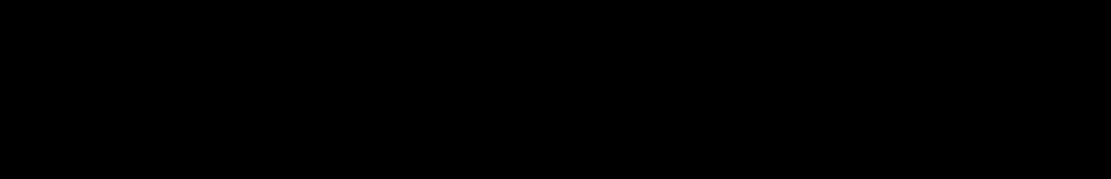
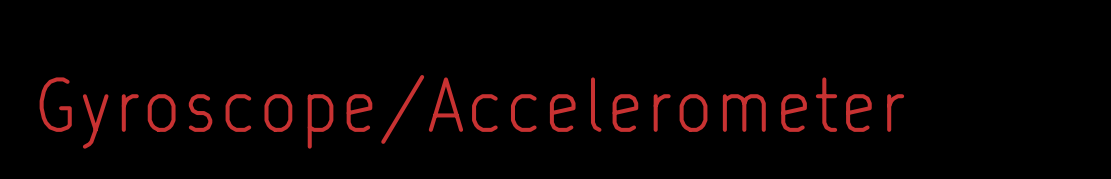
text: none -> Gyroscope/Accelerometer (471, 111)

